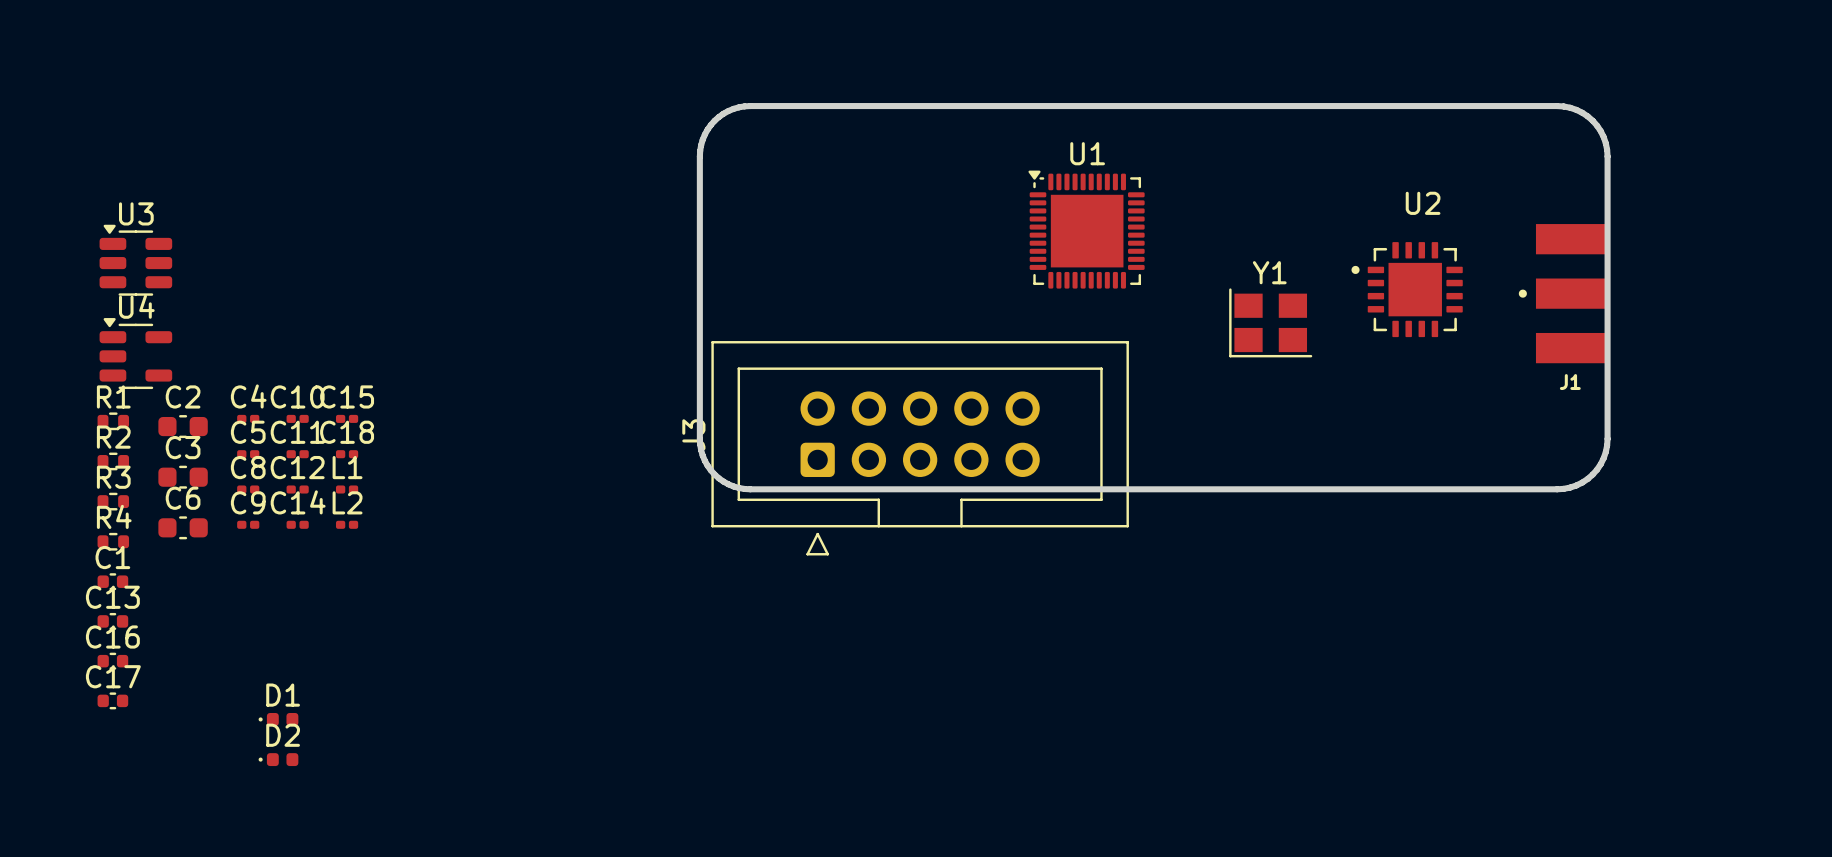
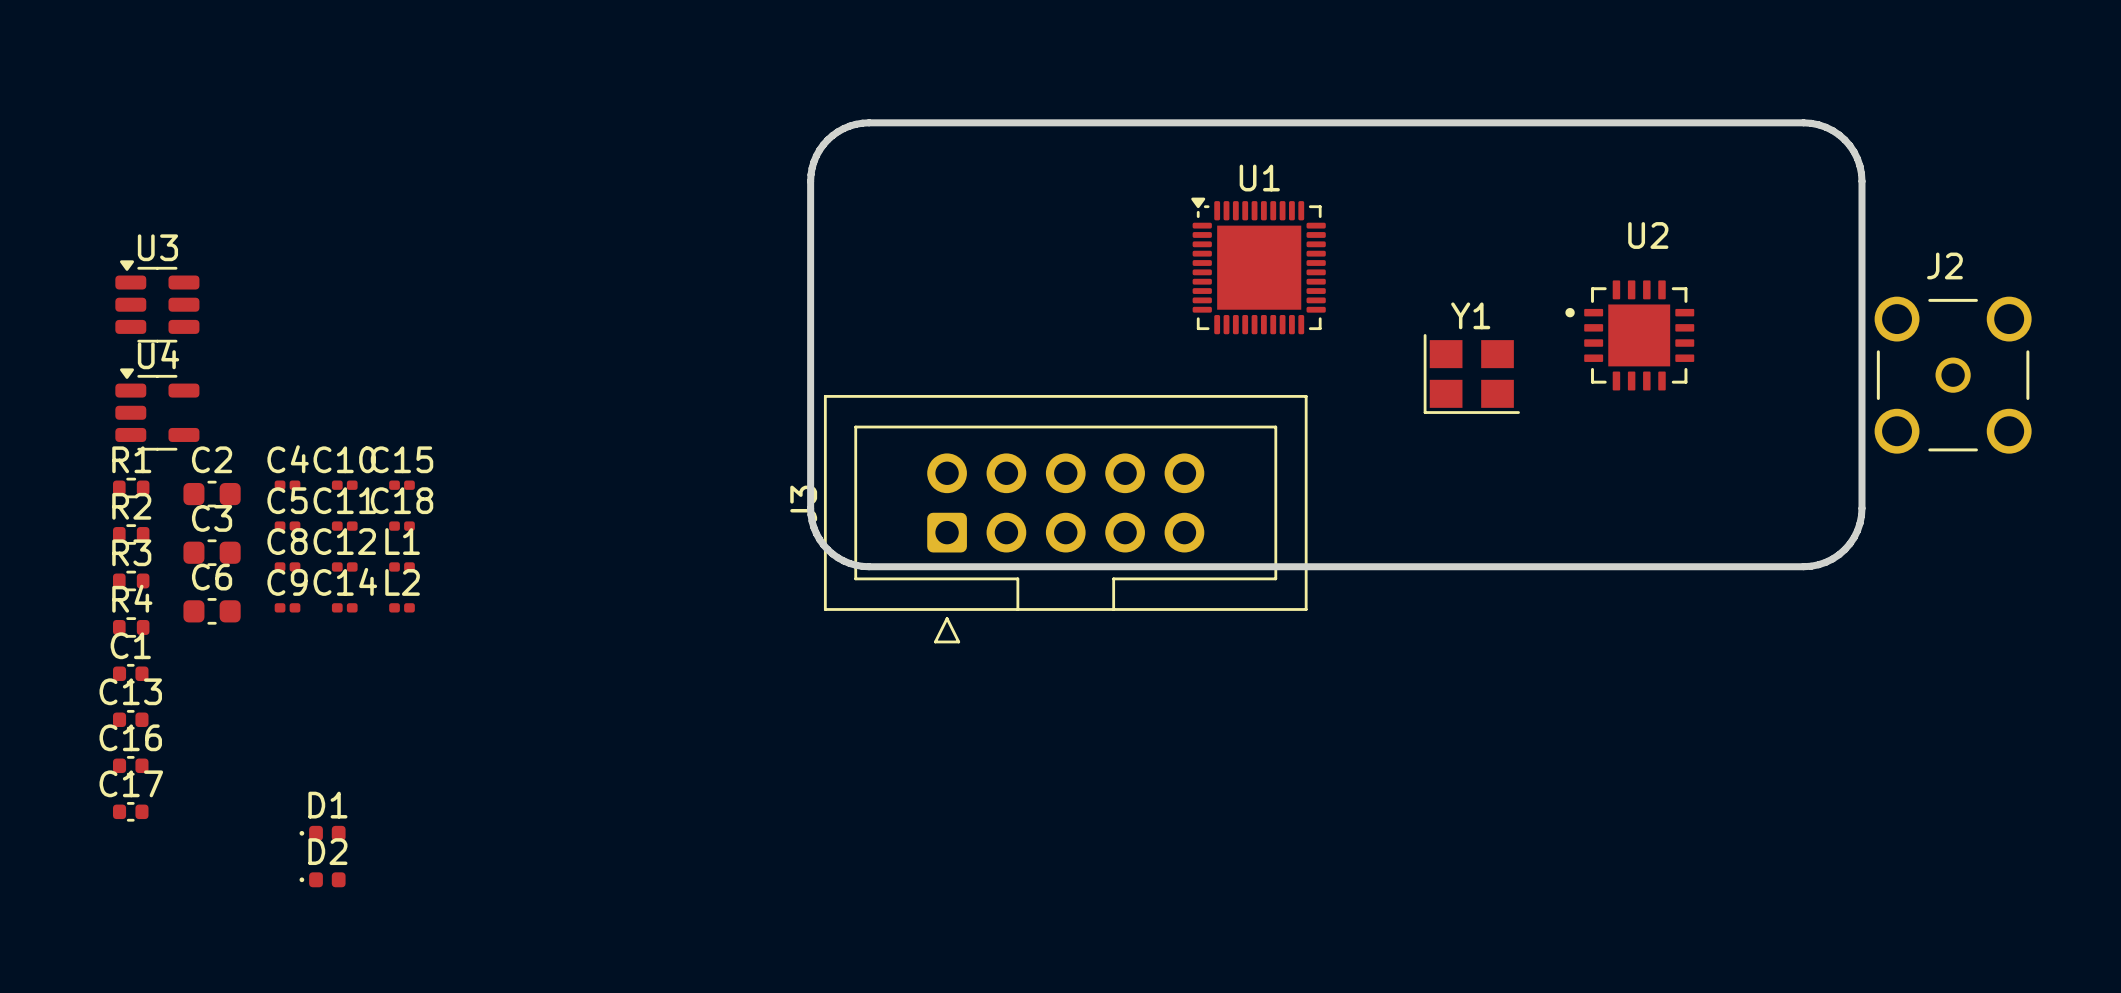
J1: (1562, 293) -> none
J2: none -> (1953, 375)

